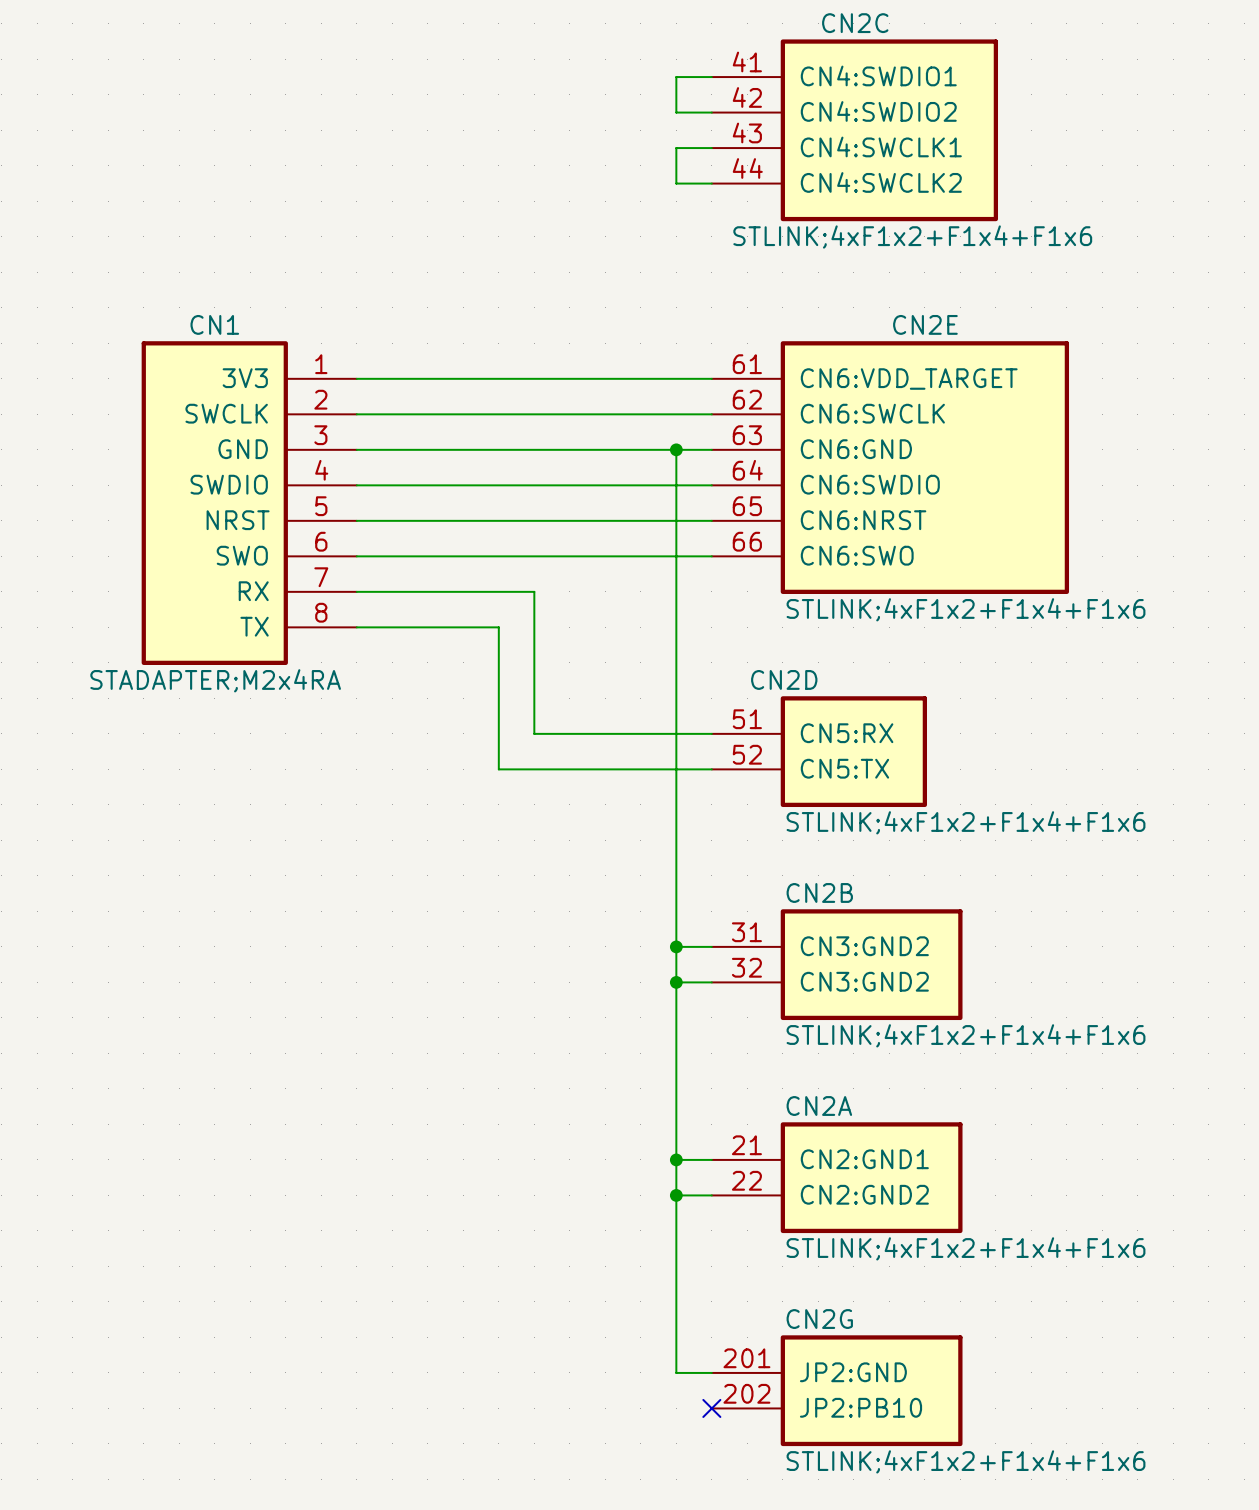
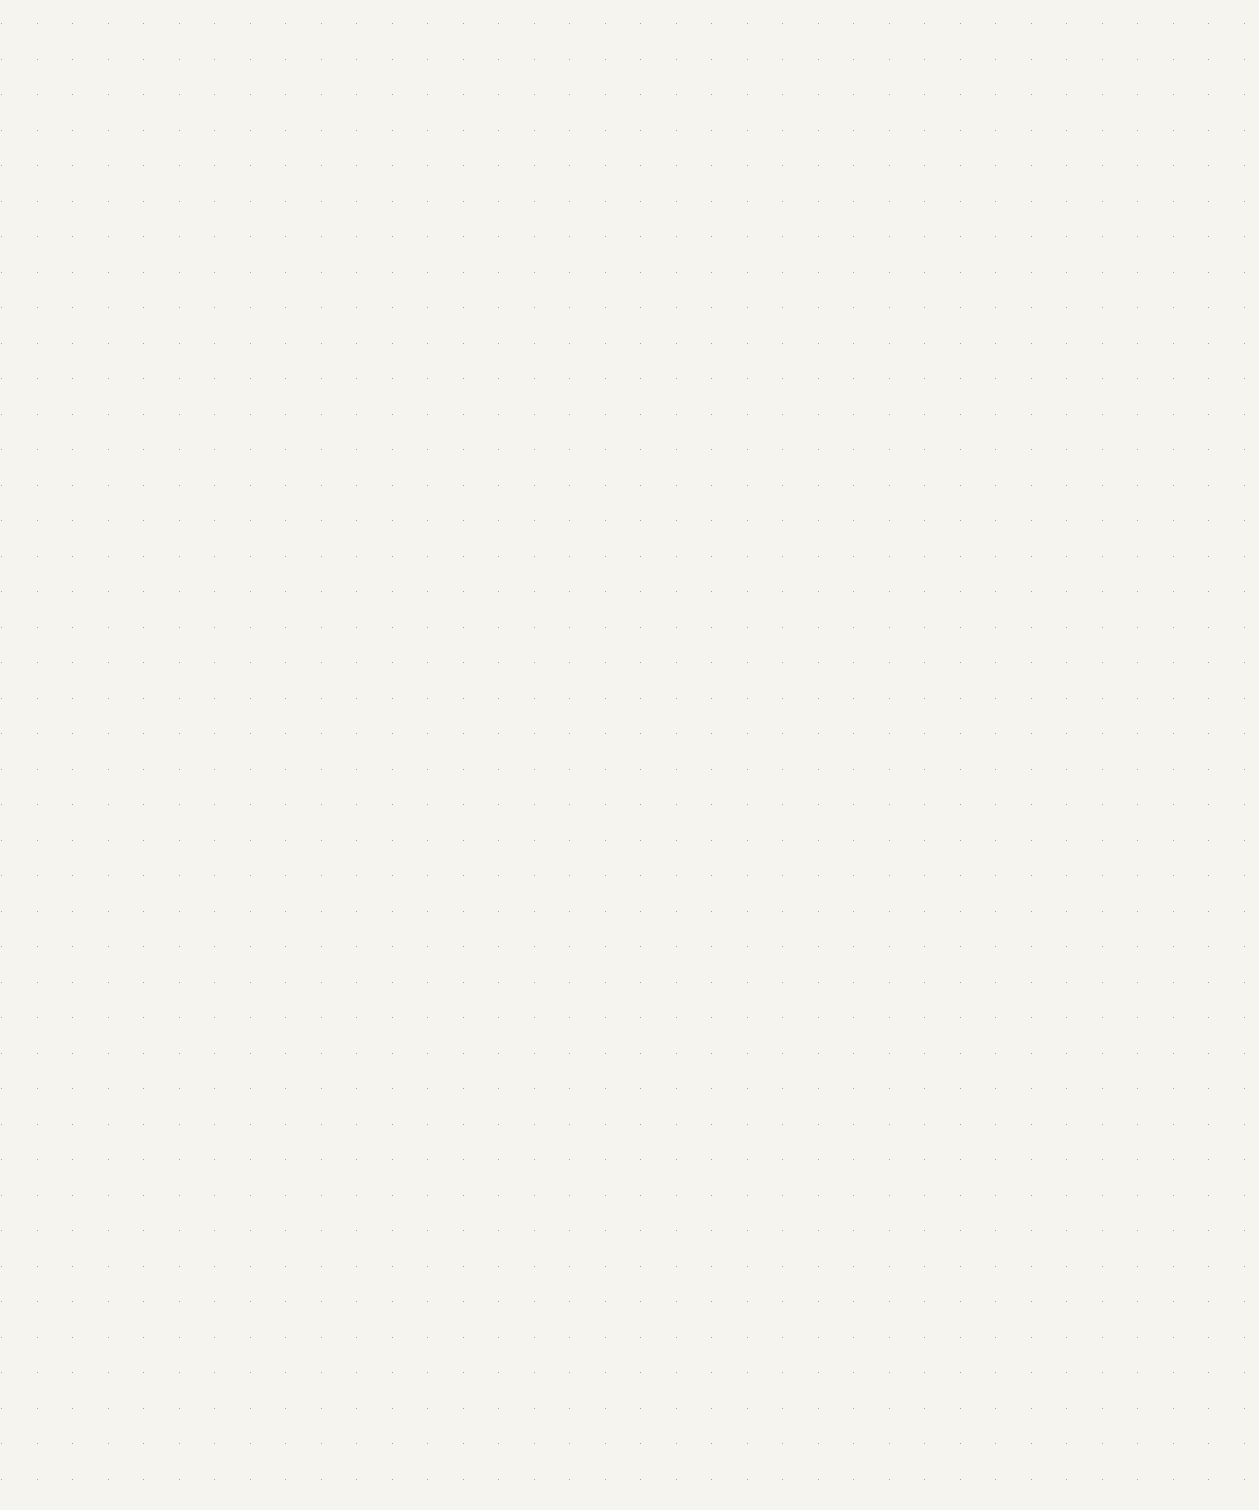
wire: (711, 77) (676, 77) (676, 112) (711, 112) -> none
CN2C: STLINK;4xF1x2+F1x4+F1x6 (854, 130) -> none
wire: (711, 148) (676, 148) (676, 183) (711, 183) -> none
wire: (356, 378) (711, 378) -> none
wire: (356, 414) (711, 414) -> none
wire: (356, 449) (711, 449) -> none
wire: (676, 449) (676, 1372) (711, 1372) -> none
junction: (676, 449) -> none
CN2E: STLINK;4xF1x2+F1x4+F1x6 (890, 467) -> none
wire: (356, 485) (711, 485) -> none
CN1: STADAPTER;M2x4RA (249, 503) -> none
wire: (356, 520) (711, 520) -> none
wire: (356, 556) (711, 556) -> none
wire: (356, 591) (534, 591) (534, 733) (711, 733) -> none
wire: (356, 627) (498, 627) (498, 769) (711, 769) -> none
CN2D: STLINK;4xF1x2+F1x4+F1x6 (819, 751) -> none
wire: (676, 946) (711, 946) -> none
junction: (676, 946) -> none
CN2B: STLINK;4xF1x2+F1x4+F1x6 (837, 964) -> none
wire: (676, 982) (711, 982) -> none
junction: (676, 982) -> none
wire: (676, 1159) (711, 1159) -> none
junction: (676, 1159) -> none
CN2A: STLINK;4xF1x2+F1x4+F1x6 (837, 1177) -> none
wire: (676, 1195) (711, 1195) -> none
junction: (676, 1195) -> none
CN2G: STLINK;4xF1x2+F1x4+F1x6 (837, 1390) -> none
no-connect mark: (711, 1408) -> none

